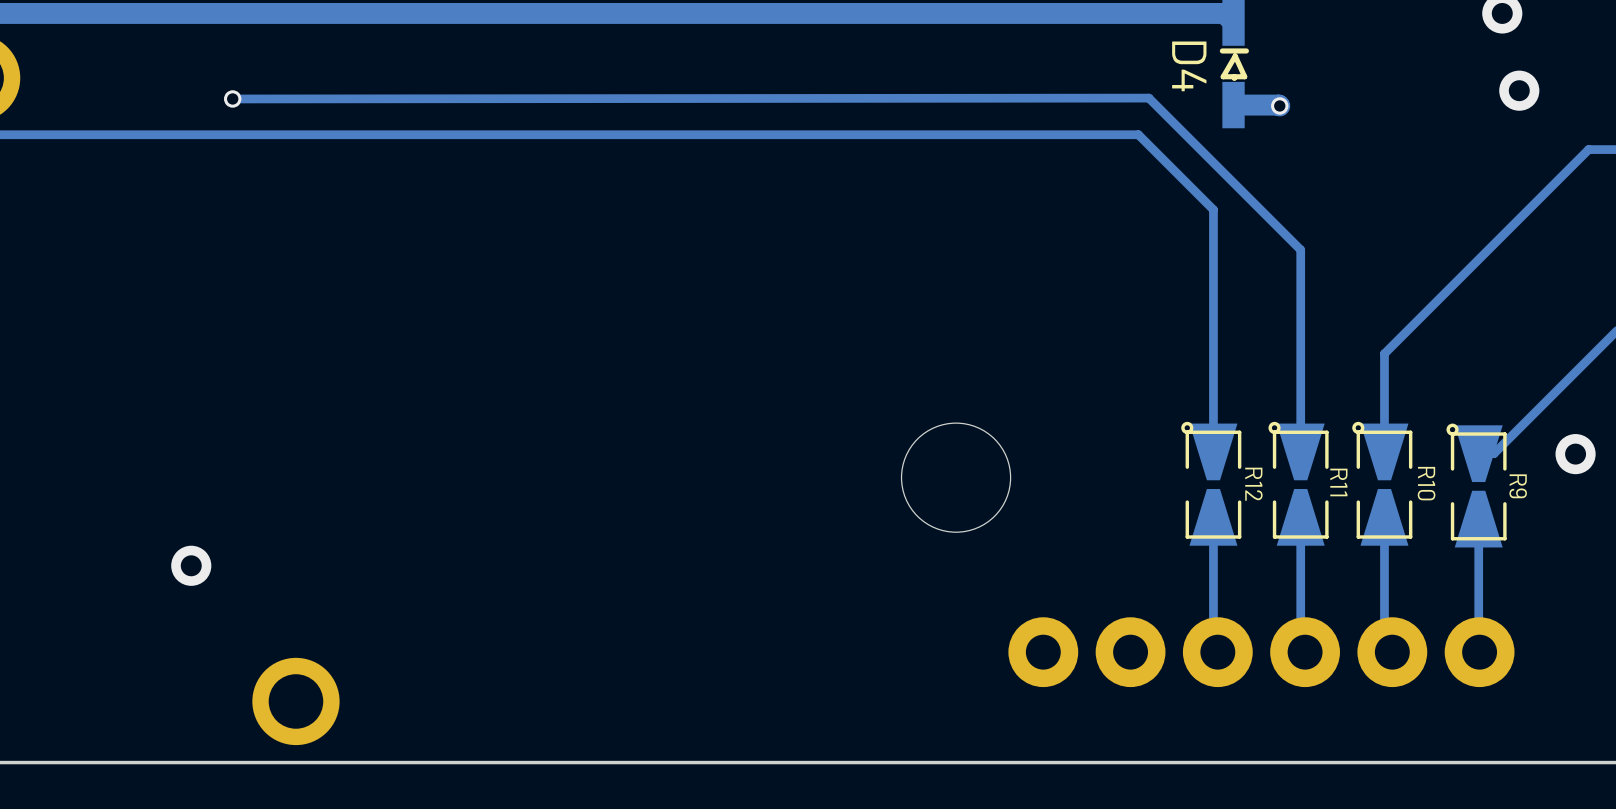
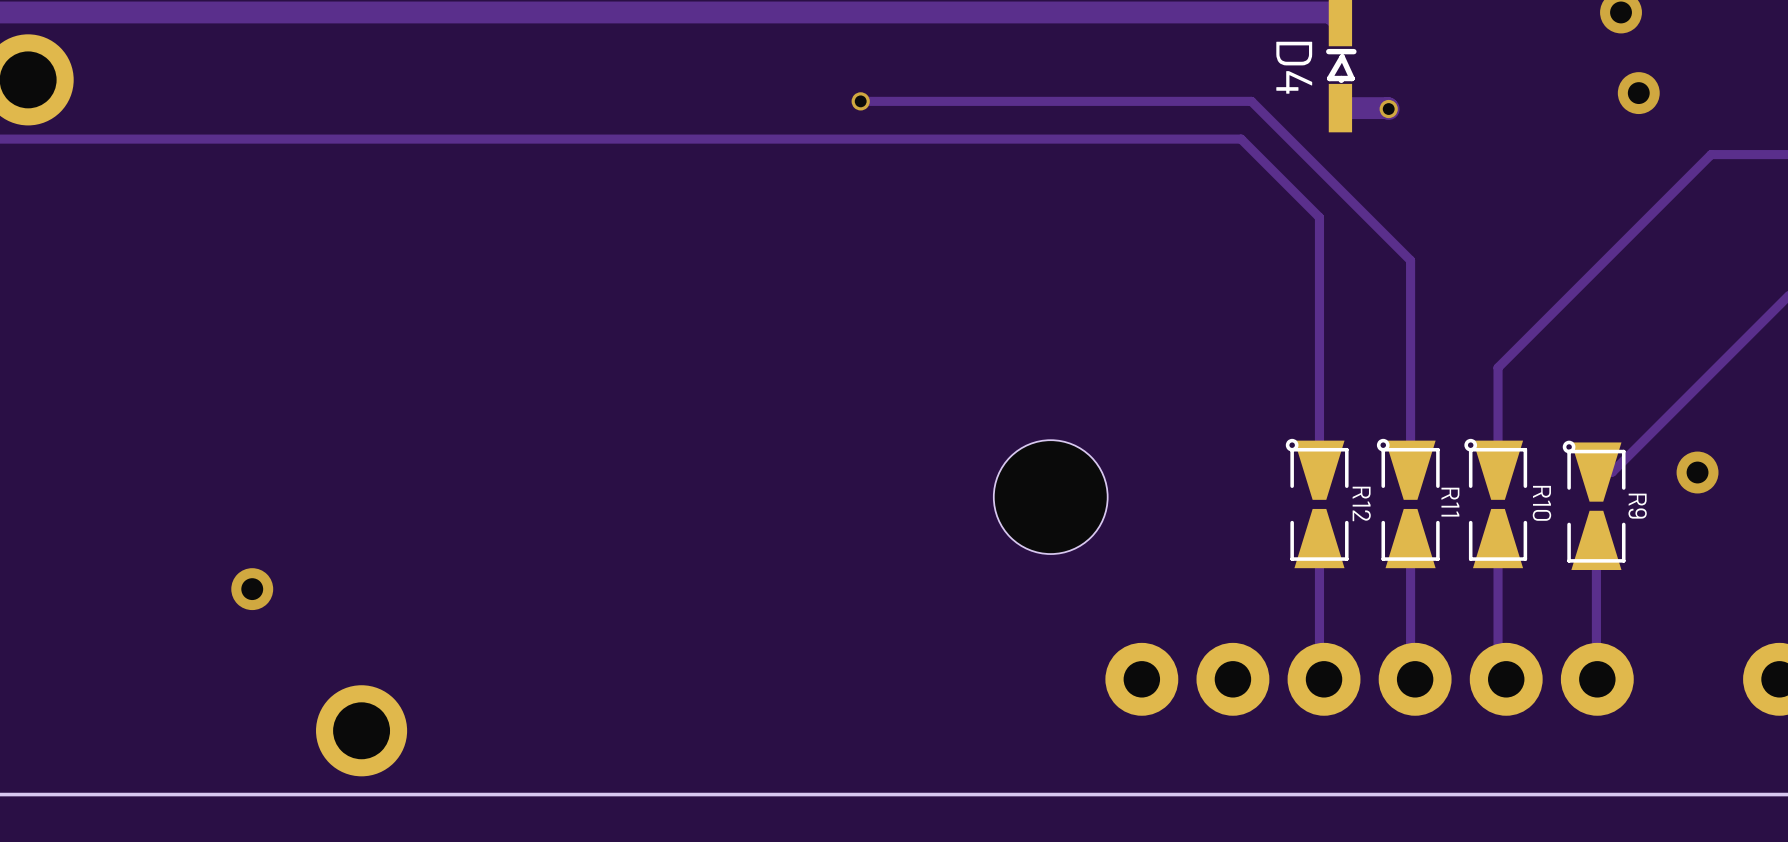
track: (232, 98) (1148, 98) (1300, 250) -> (860, 101) (1251, 101) (1410, 260)
via: (232, 98) -> none
via: none -> (860, 101)

